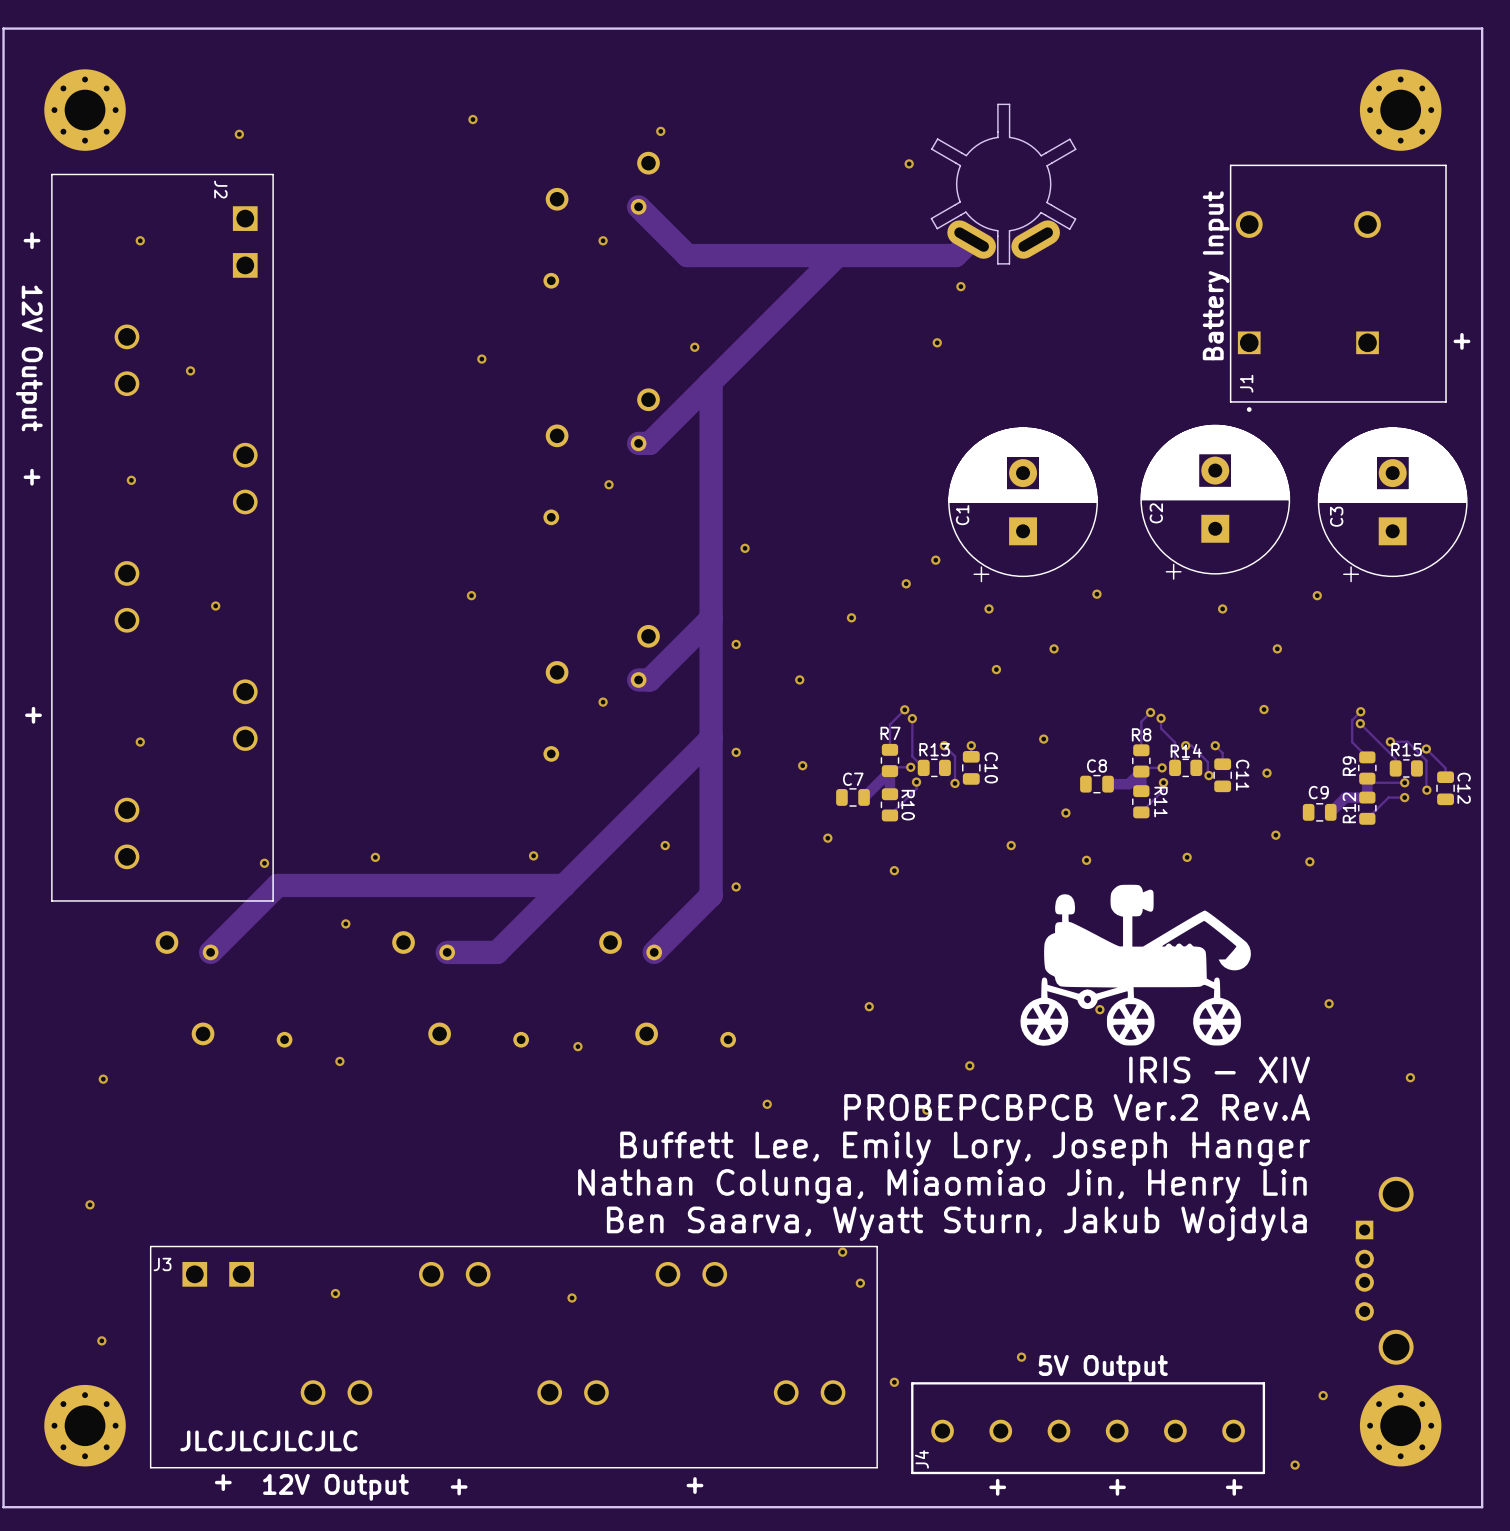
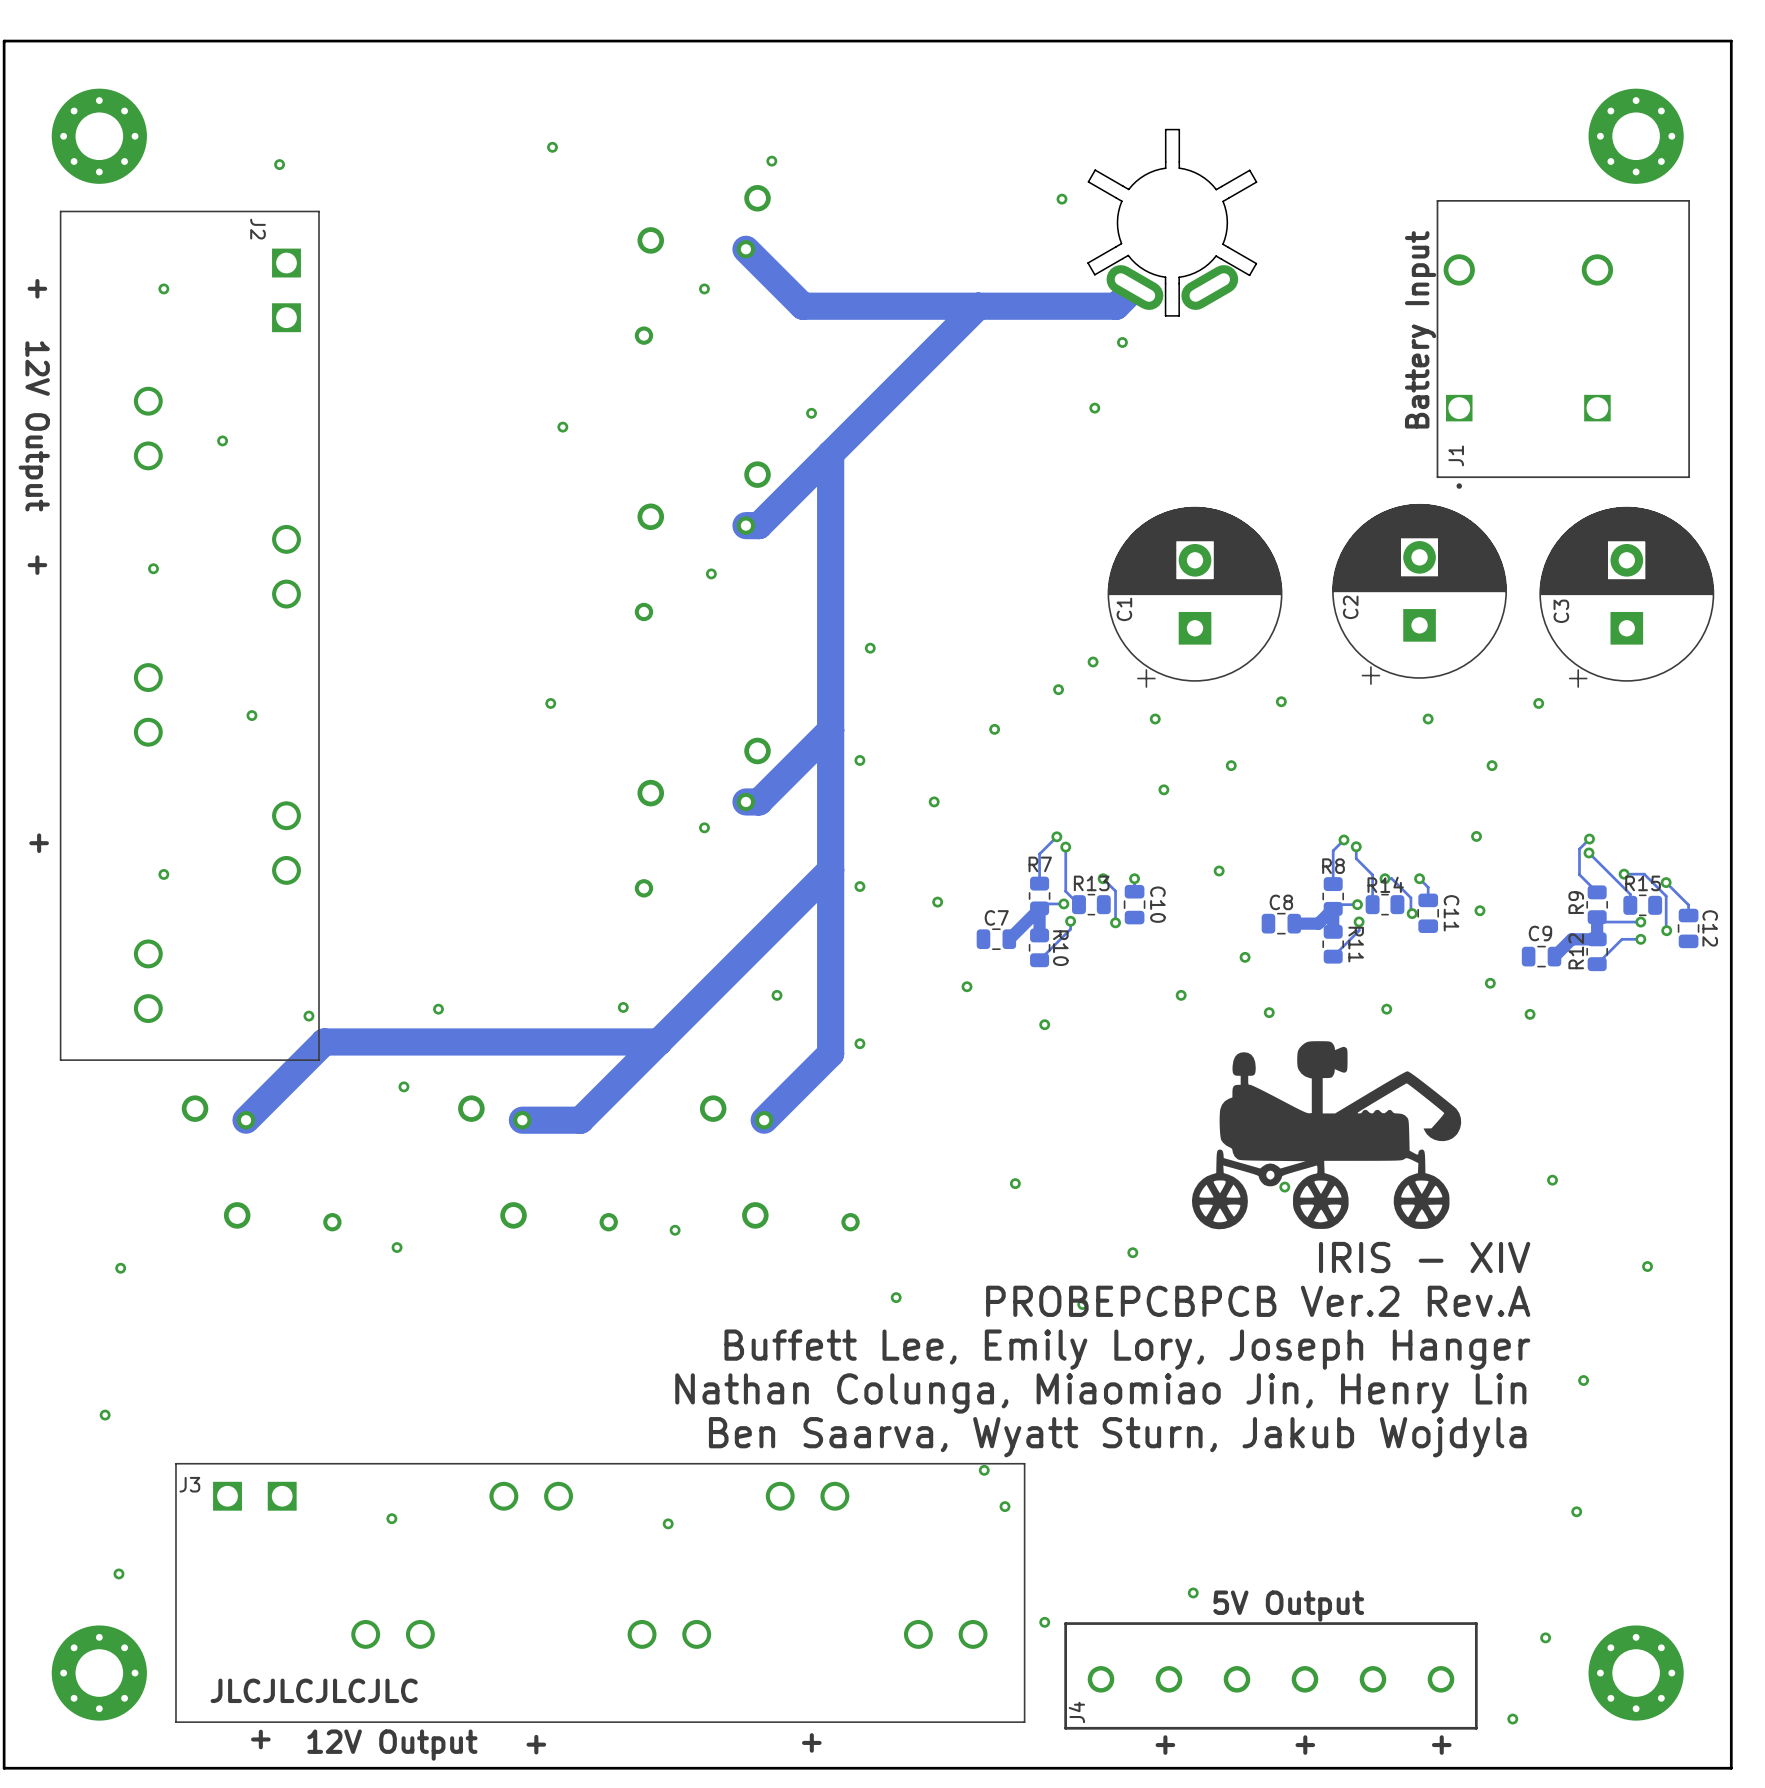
text: + (1461, 341) -> none
via: none -> (1583, 1380)
part: (1384, 1270) -> none
via: none -> (1576, 1511)

